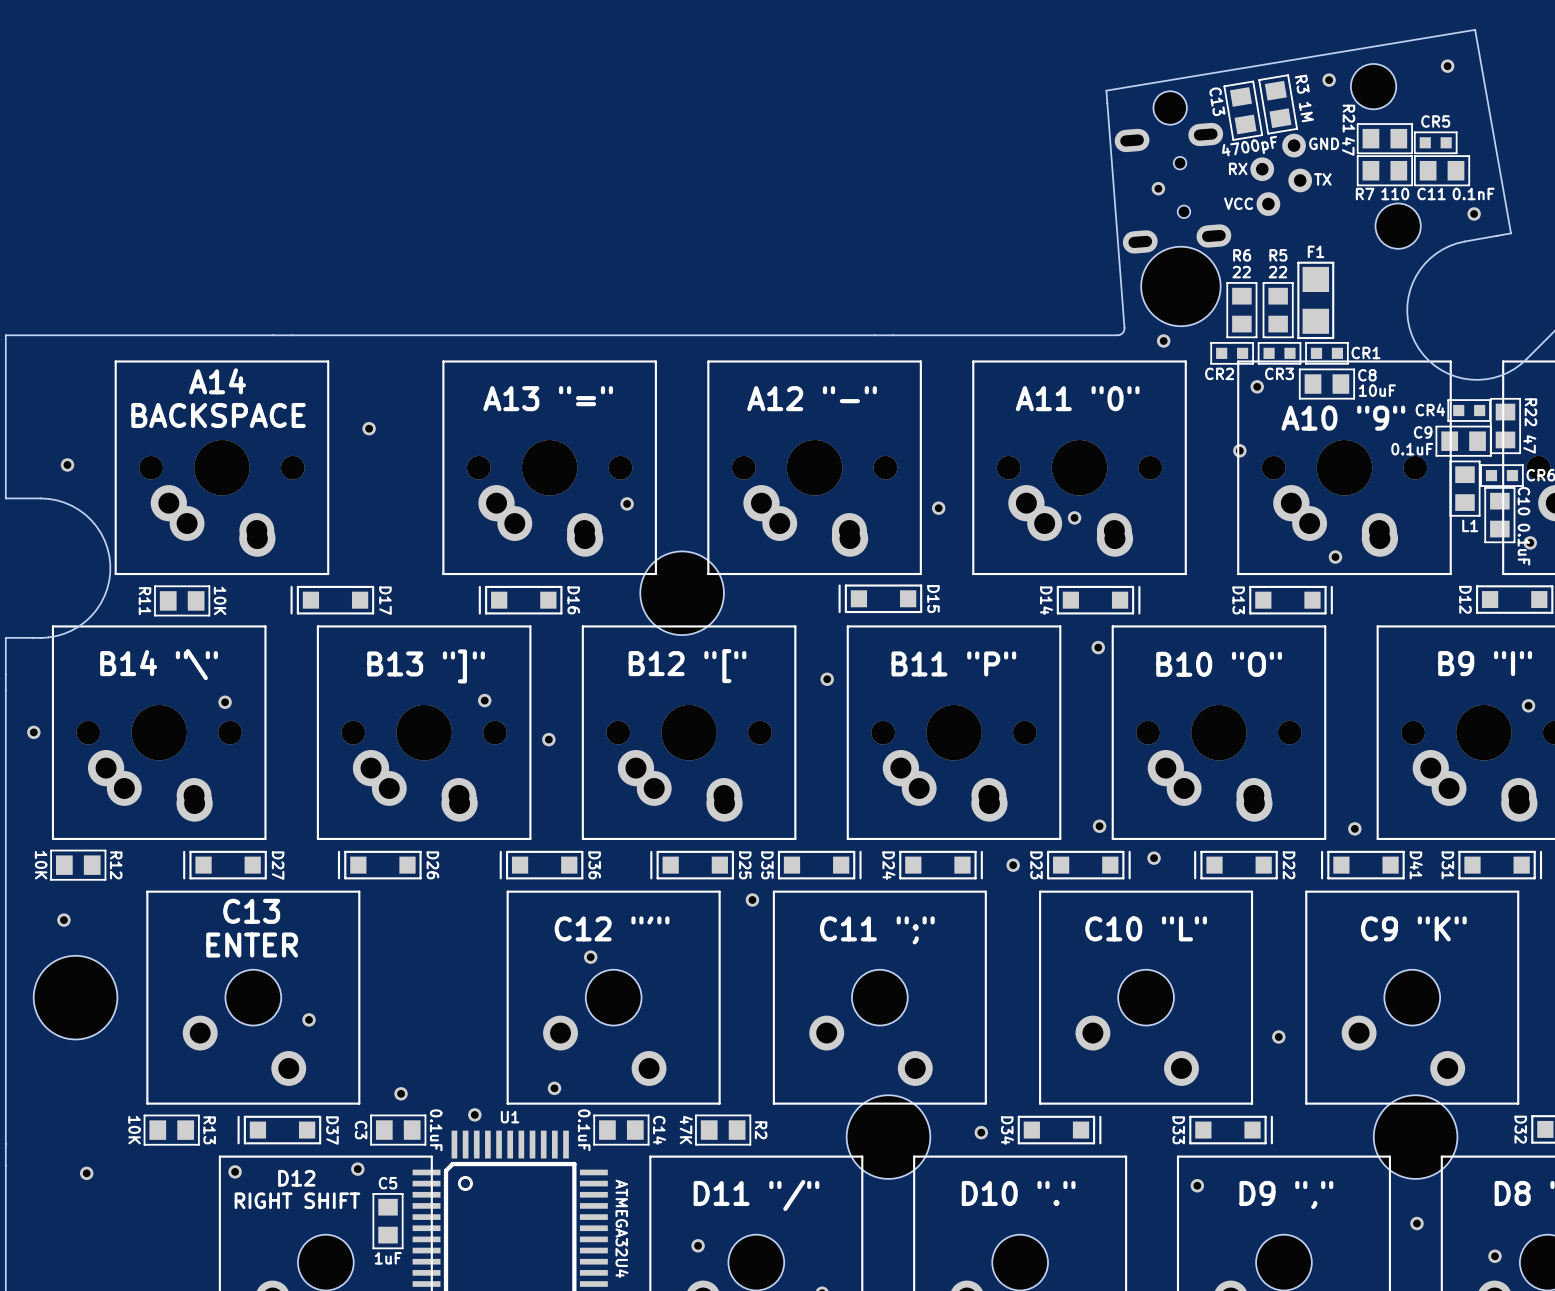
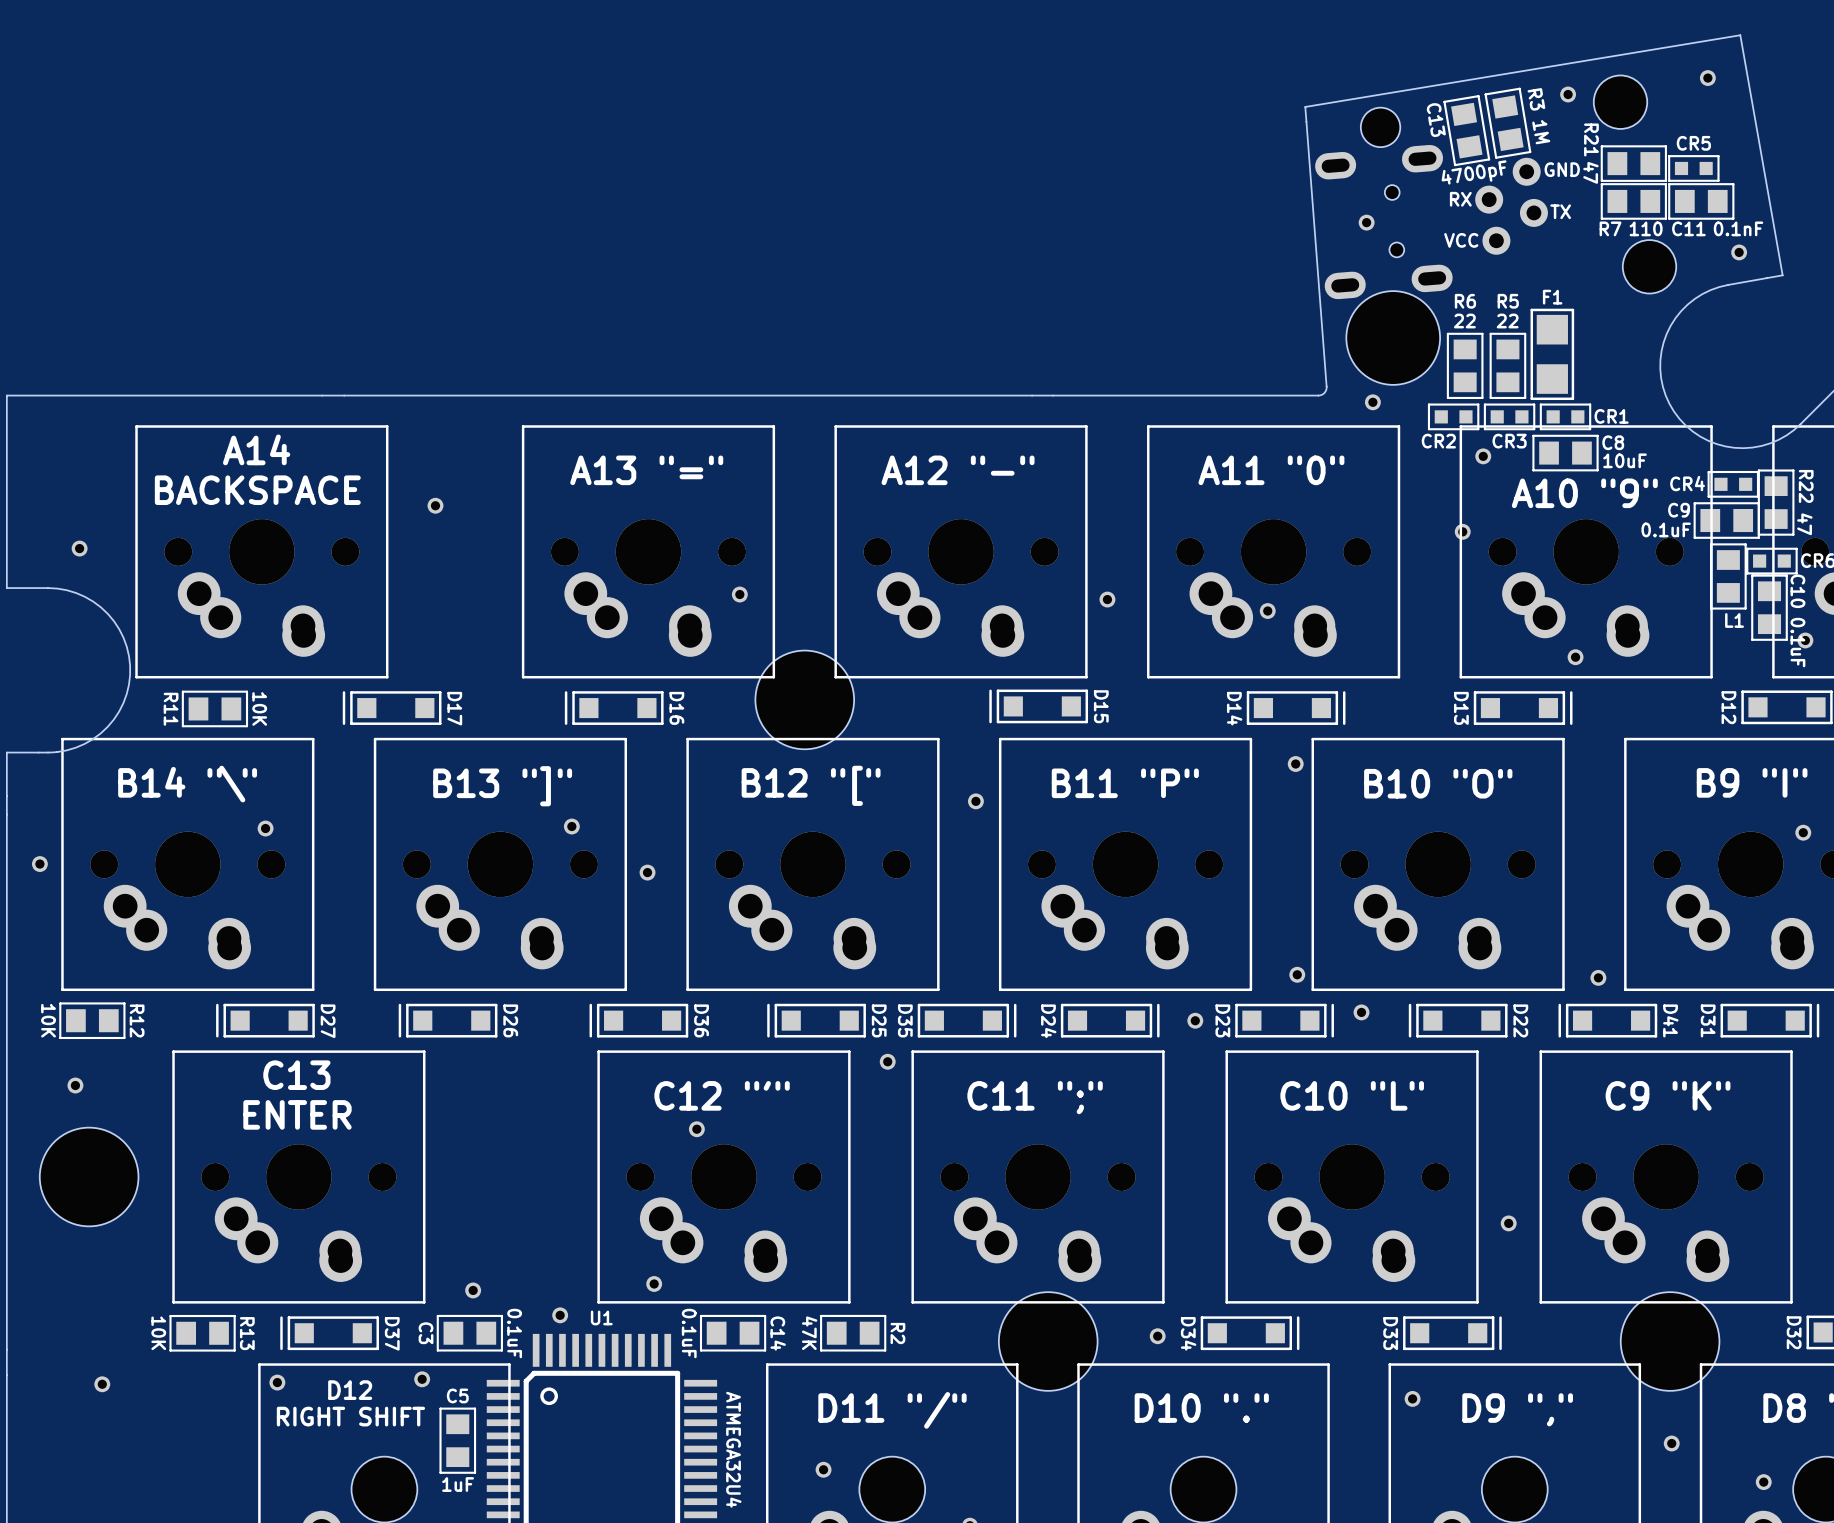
part footprint: [146, 890, 361, 1105] -> [172, 1050, 426, 1304]
part footprint: [506, 890, 721, 1105] -> [597, 1050, 851, 1304]
part footprint: [772, 890, 987, 1105] -> [911, 1050, 1165, 1304]
part footprint: [1039, 890, 1254, 1105] -> [1225, 1050, 1479, 1304]
part footprint: [1305, 890, 1520, 1105] -> [1539, 1050, 1793, 1304]
part: (309, 1019) -> none

